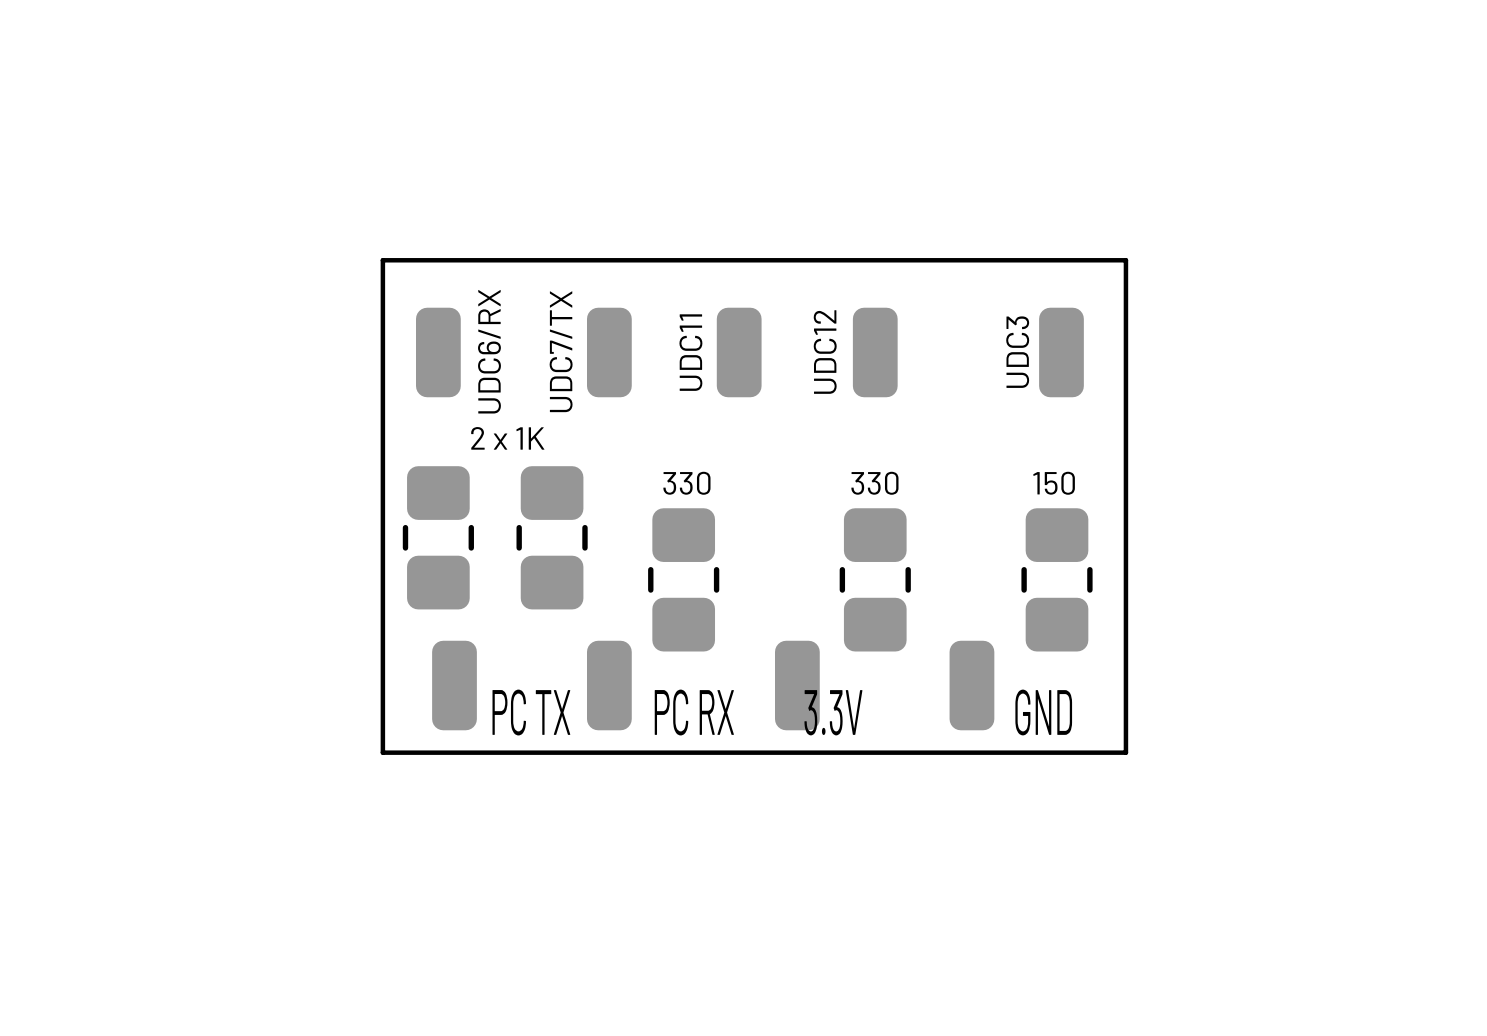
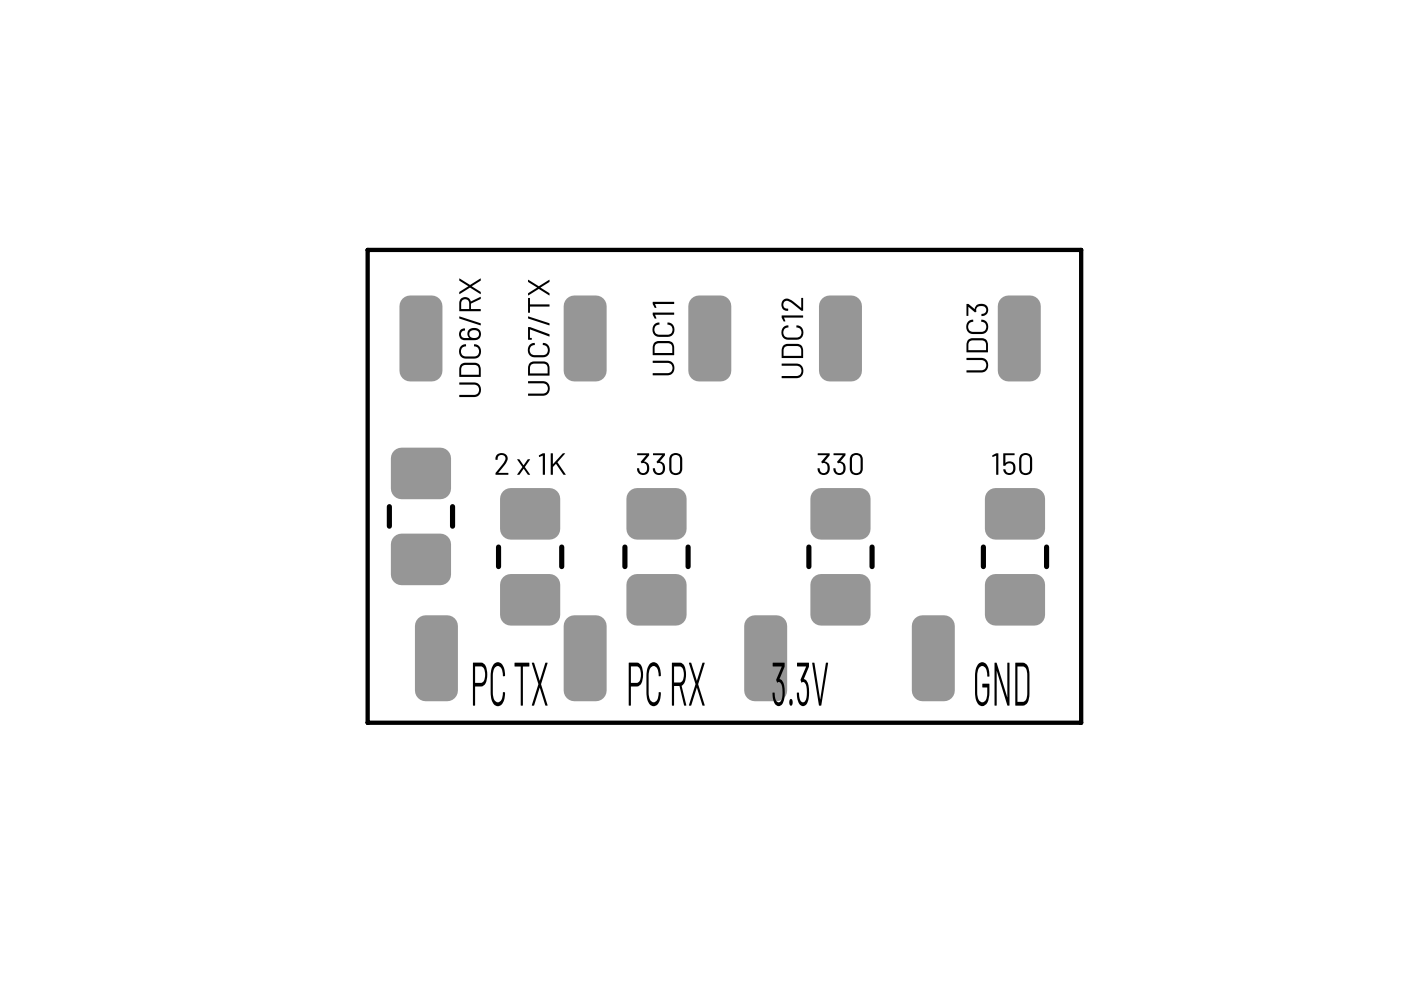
2 x 1K name position: 2 x 1K (507, 438) -> 2 x 1K (530, 463)
part position: (552, 537) -> (530, 556)

